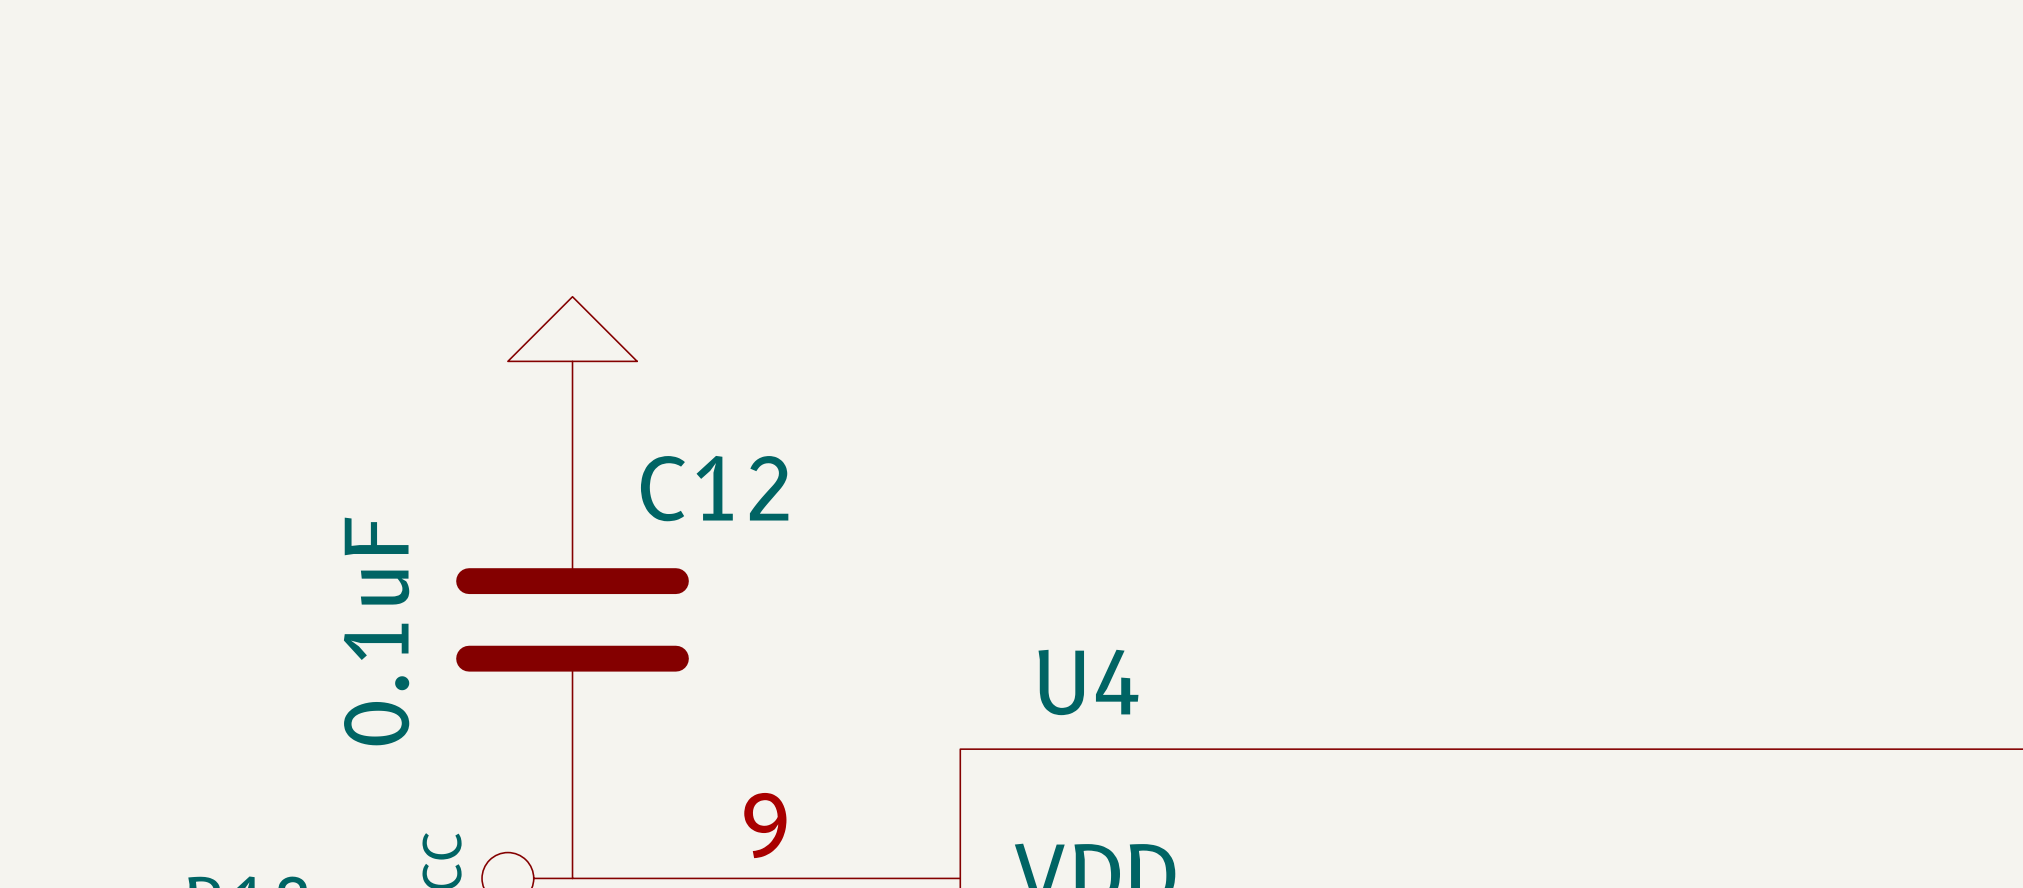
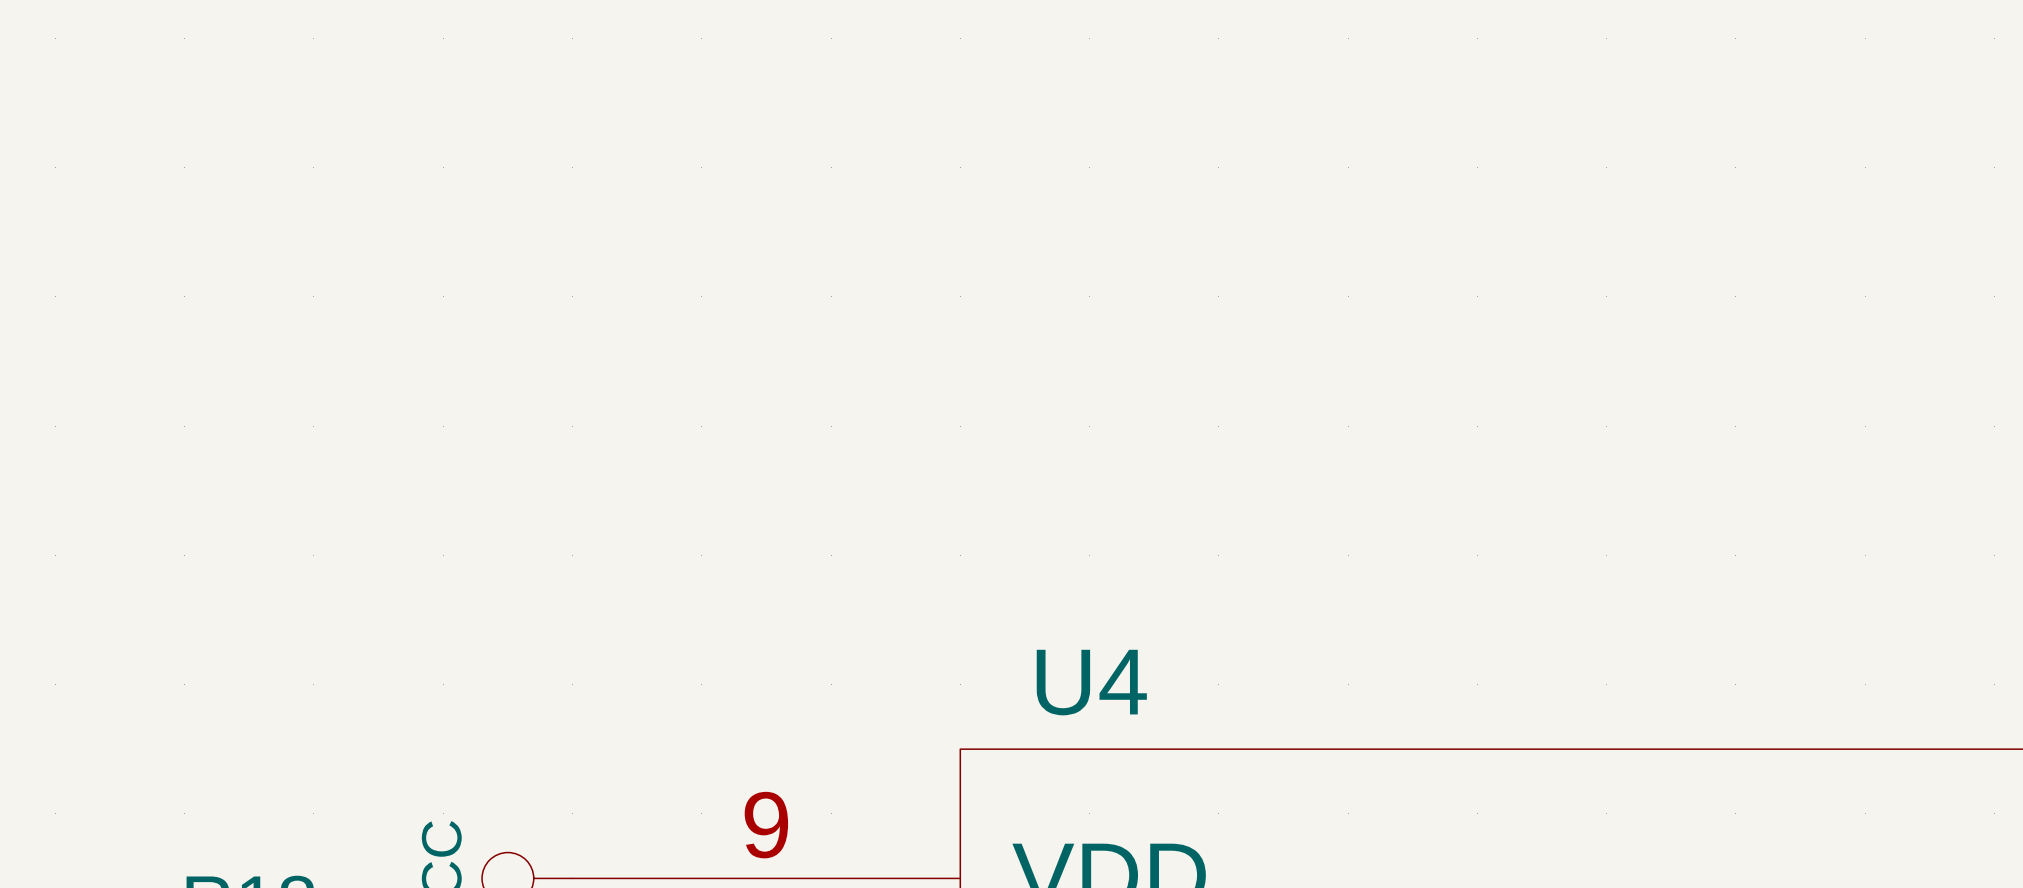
power symbol: (572, 329) -> none
C12: 0.1uF (572, 619) -> none

